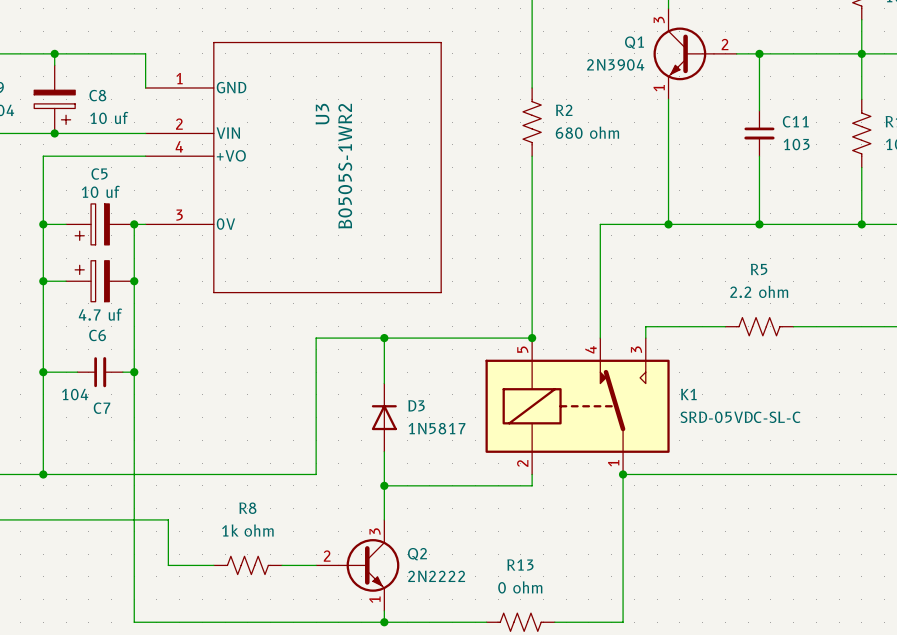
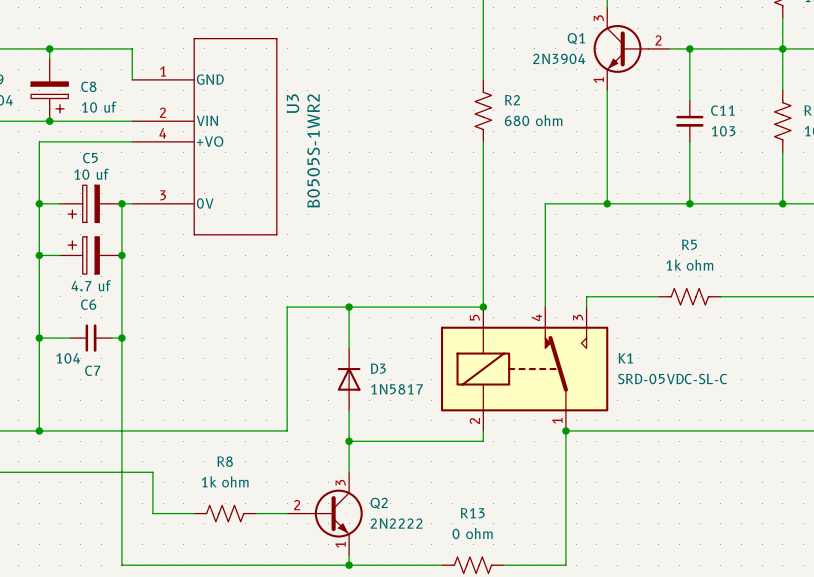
U3 symbol: [145, 41, 442, 294] -> [132, 38, 278, 236]
R5 value: 2.2 ohm (759, 291) -> 1k ohm (689, 265)

